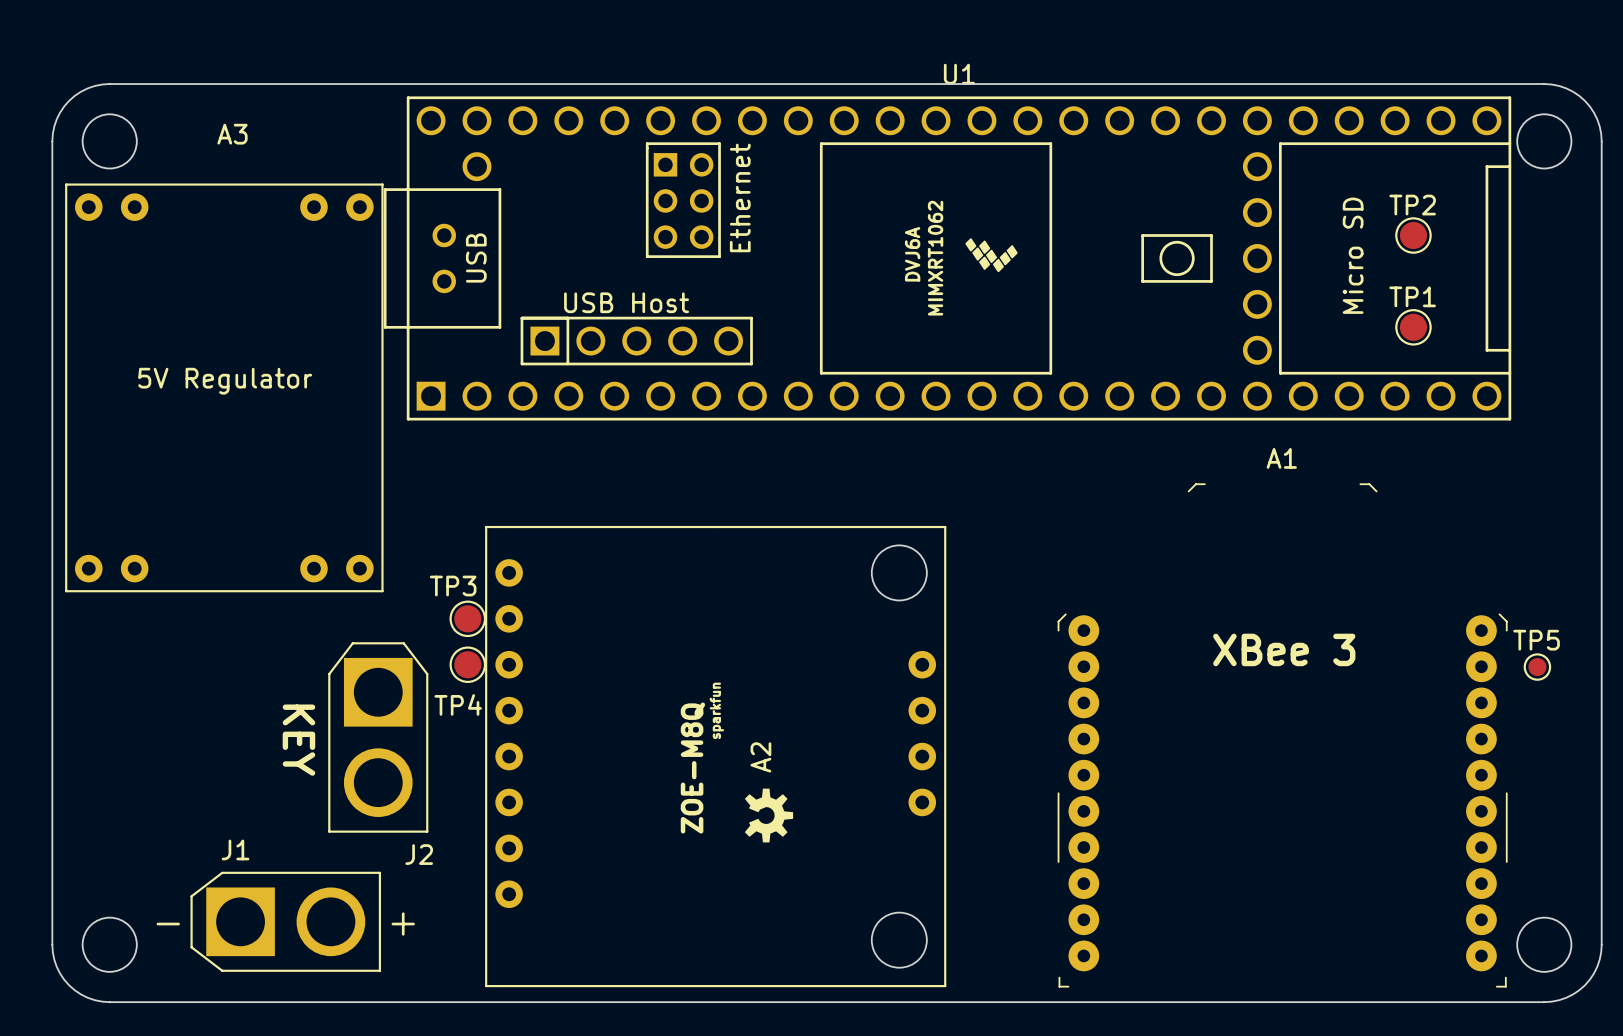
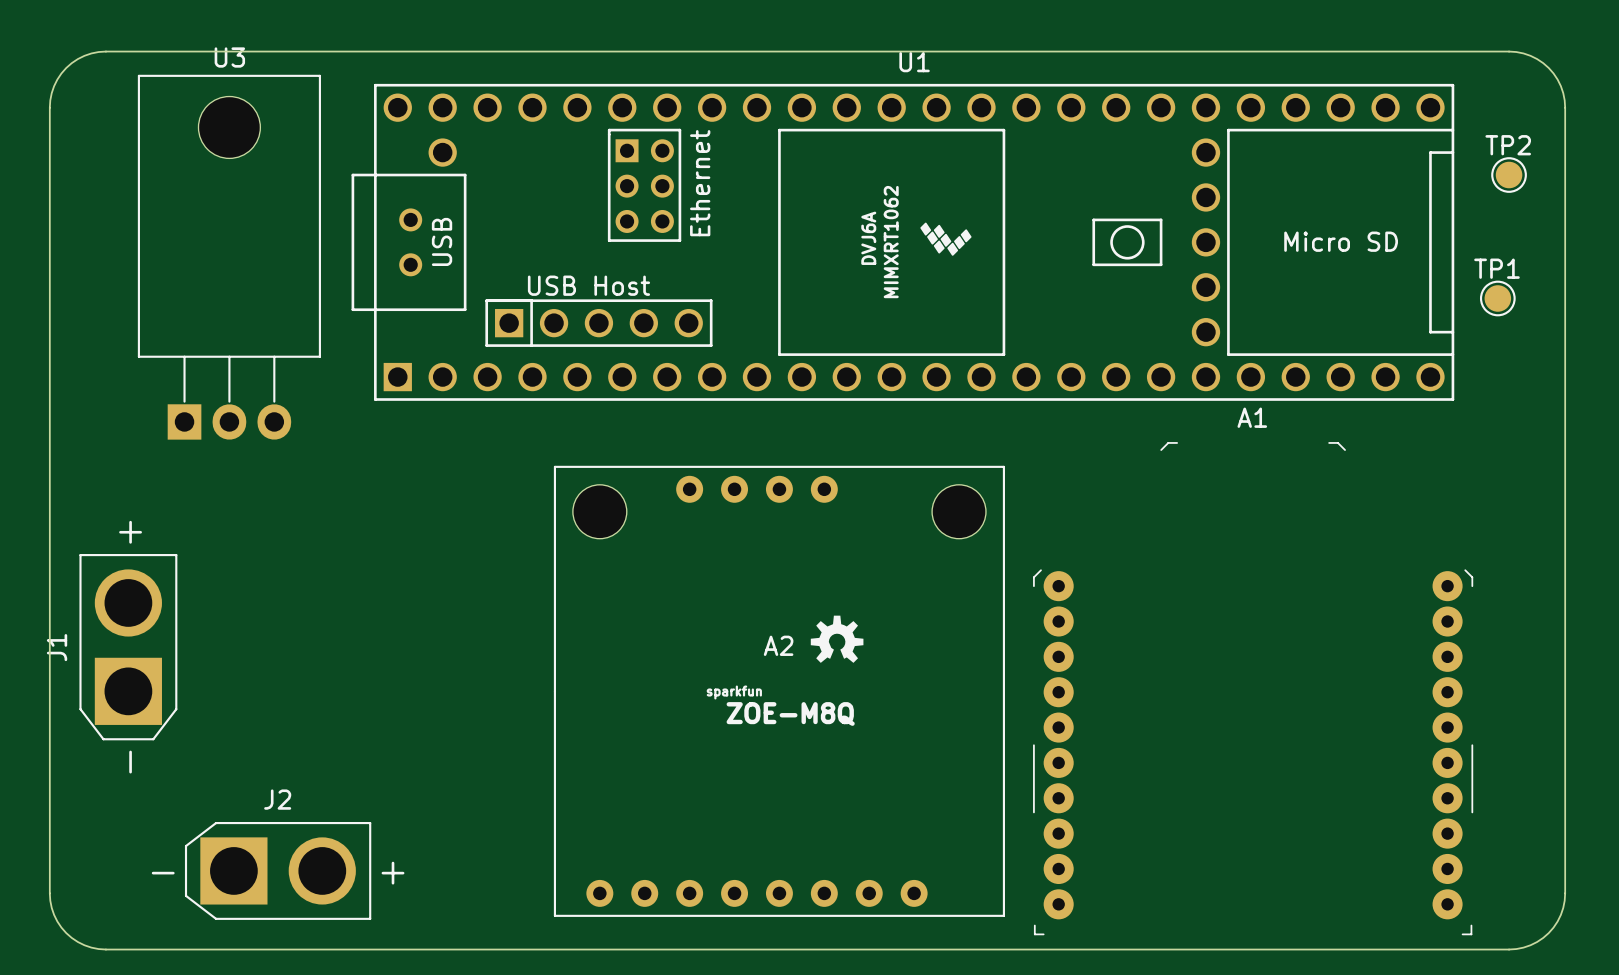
round board edge: [81, 113, 138, 170] -> none
round board edge: [1516, 113, 1573, 170] -> none
TP2 position: (1413, 235) -> (1509, 175)
U1 text rotation: 0° (1353, 255) -> 90° clockwise (1341, 241)
U1 position: (947, 258) -> (902, 242)
U3: none -> (229, 257)
TP1 position: (1413, 327) -> (1497, 298)
A3: (224, 387) -> none
TP3: (467, 618) -> none
text: XBee 3 (1284, 649) -> none
TP4: (467, 664) -> none
TP5: (1537, 667) -> none
J1: none -> (128, 647)
J2: (378, 737) -> none
text: KEY (298, 740) -> none
A2 rotation: 0° (715, 756) -> 90° counterclockwise (779, 691)
J1 name: J1 (235, 849) -> J2 (277, 799)
round board edge: [81, 916, 138, 973] -> none
round board edge: [1516, 916, 1573, 973] -> none

